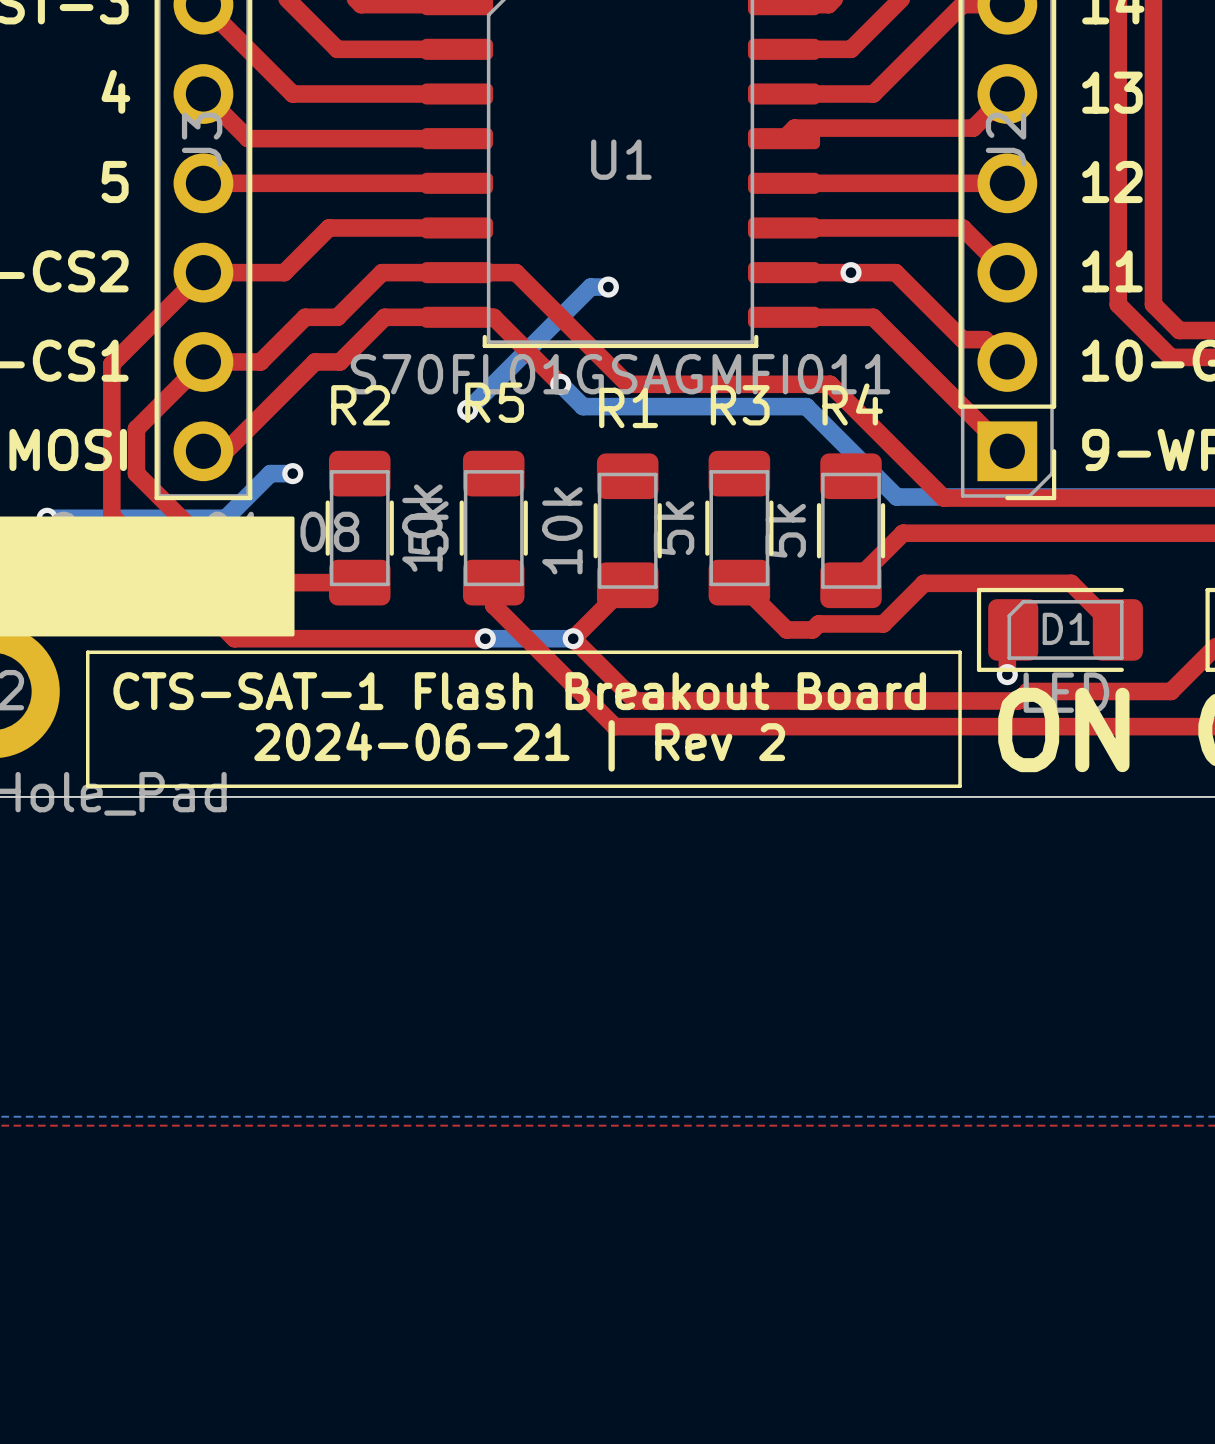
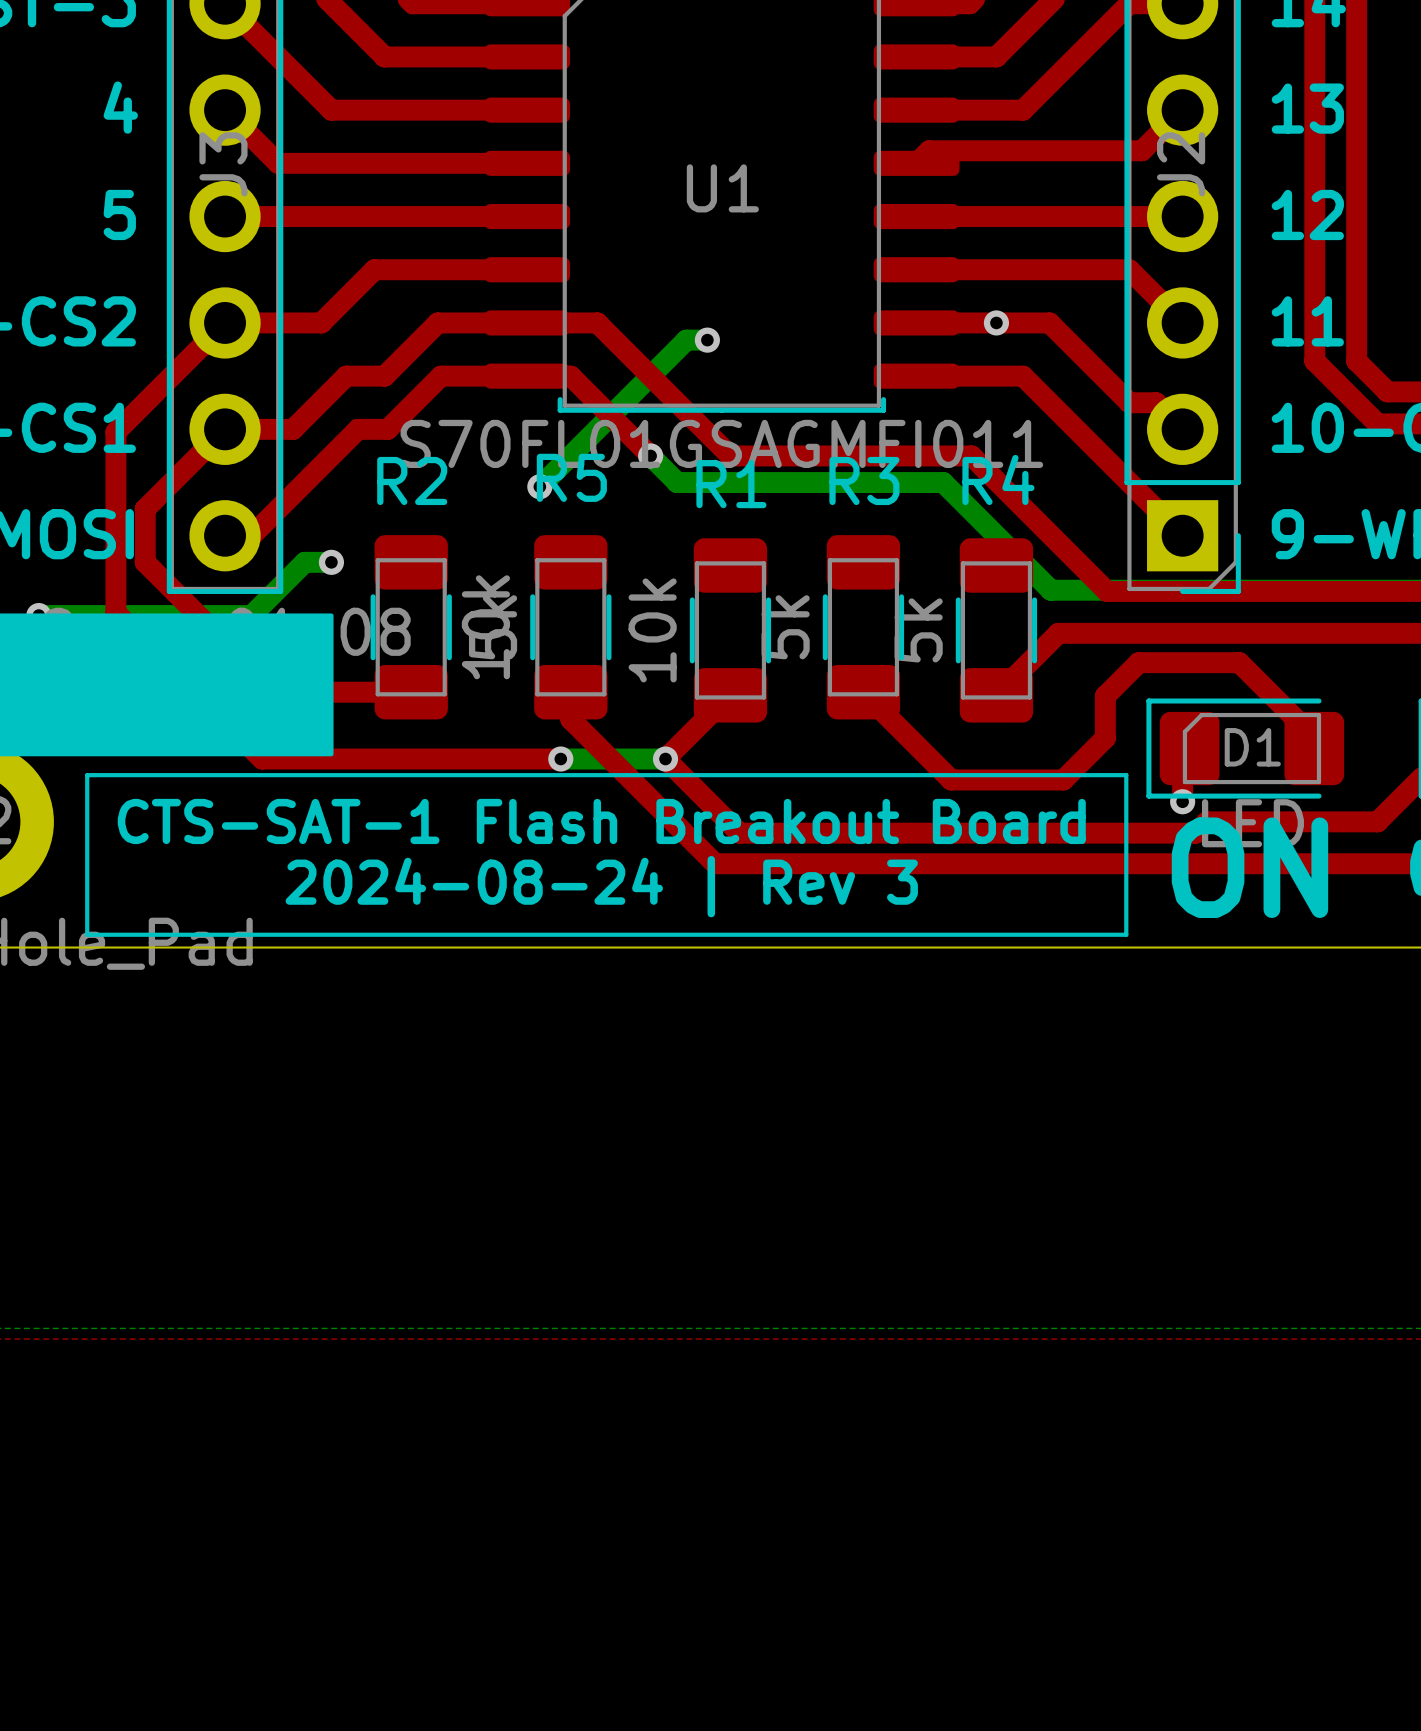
top track: (786, 629) (812, 629) (818, 623) (883, 623) (924, 583) (1071, 583) (1117, 629) -> (919, 748) (951, 779) (1063, 779) (1105, 738) (1105, 696) (1138, 662) (1239, 662) (1314, 737) (1314, 748)
text: 2024-06-21 | Rev 2 (519, 745) -> 2024-08-24 | Rev 3 (601, 886)

